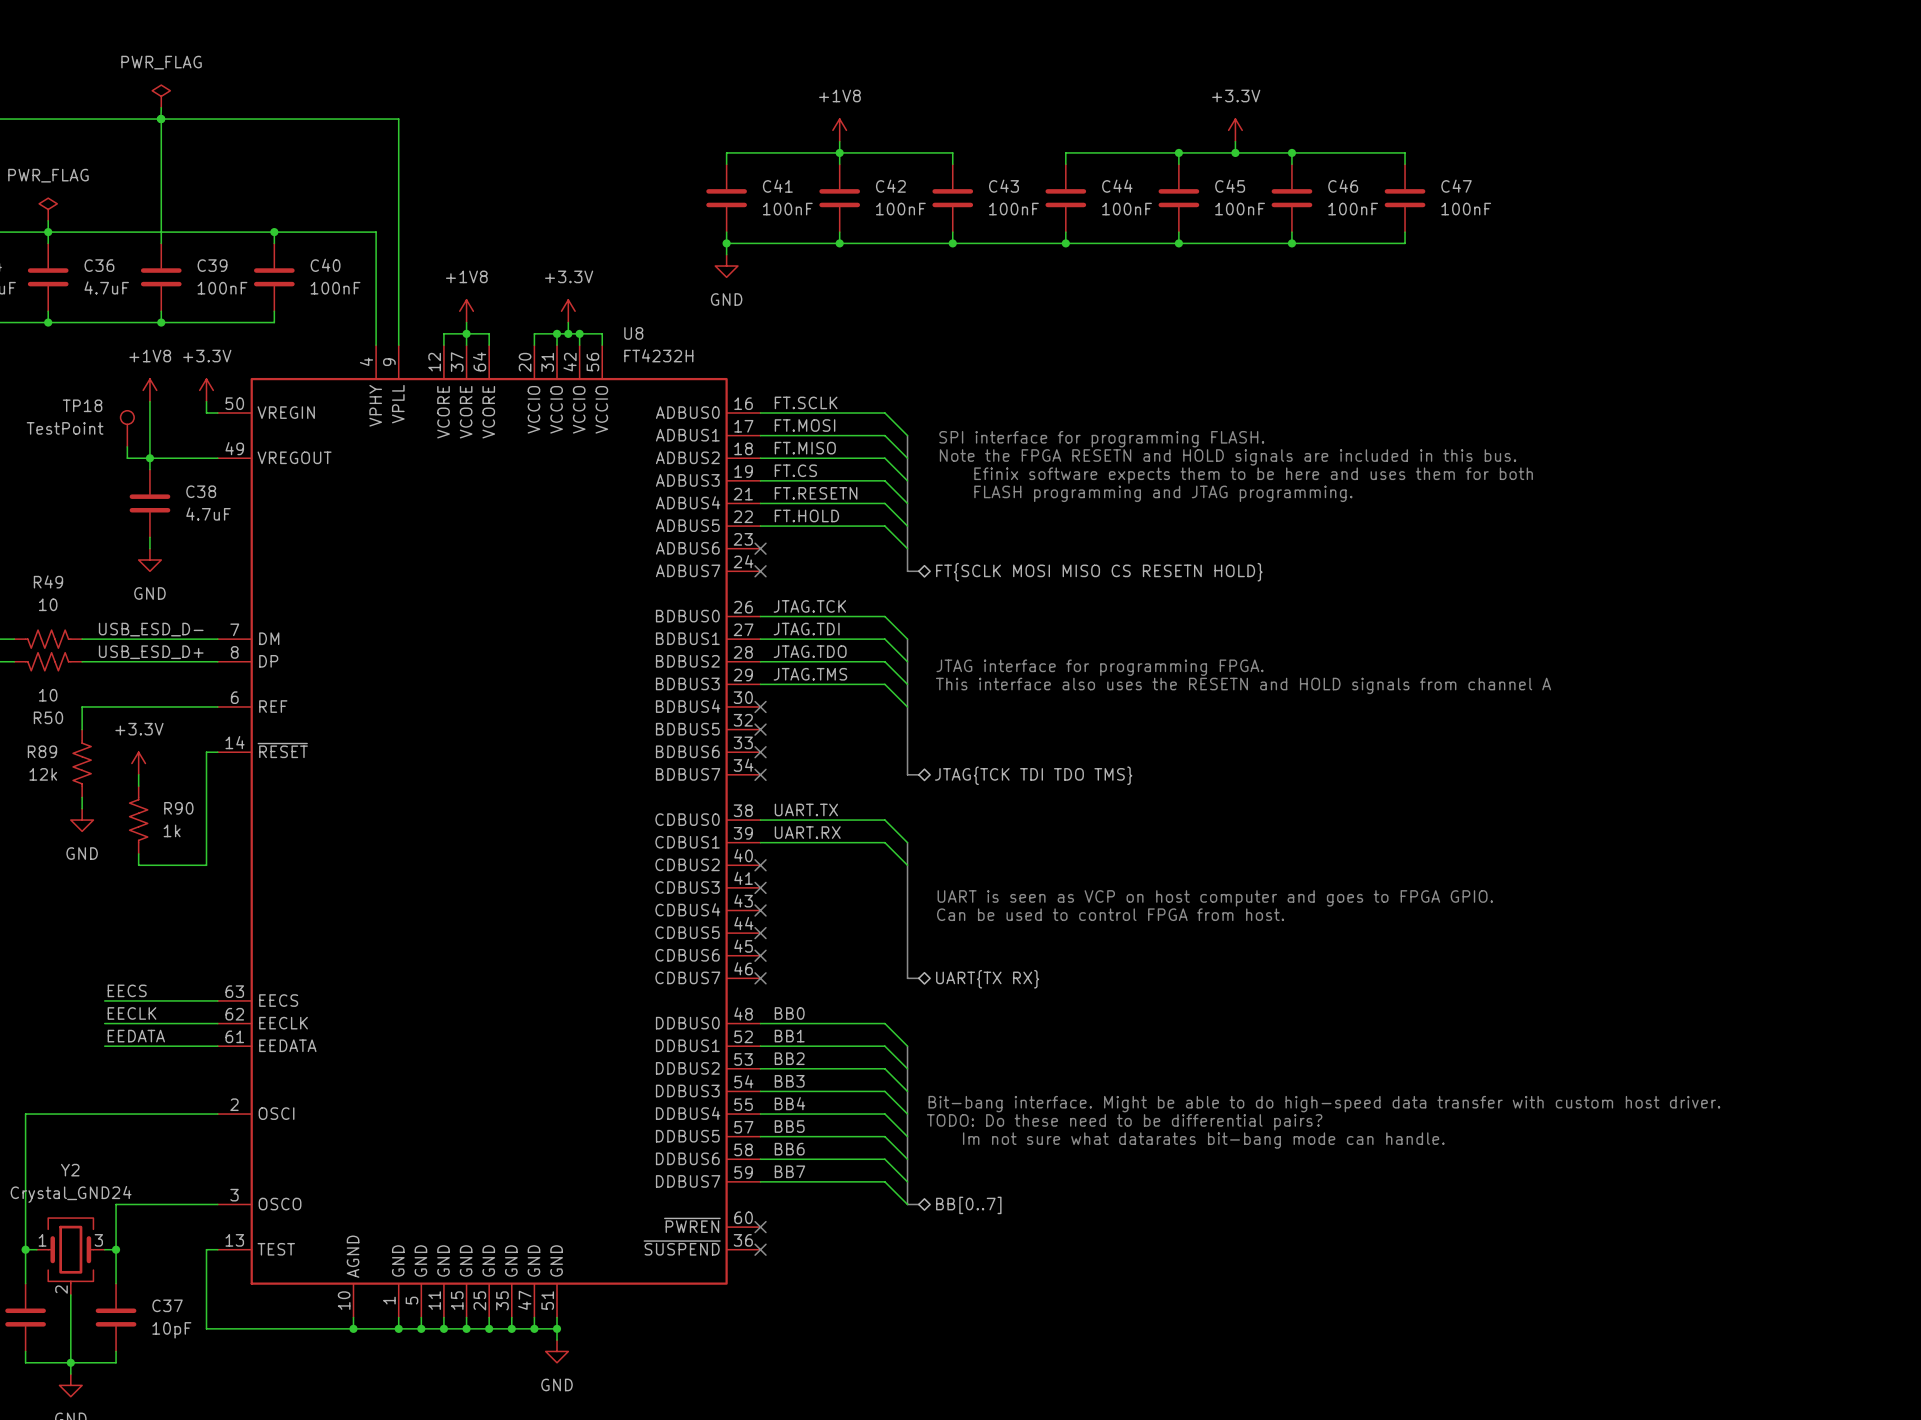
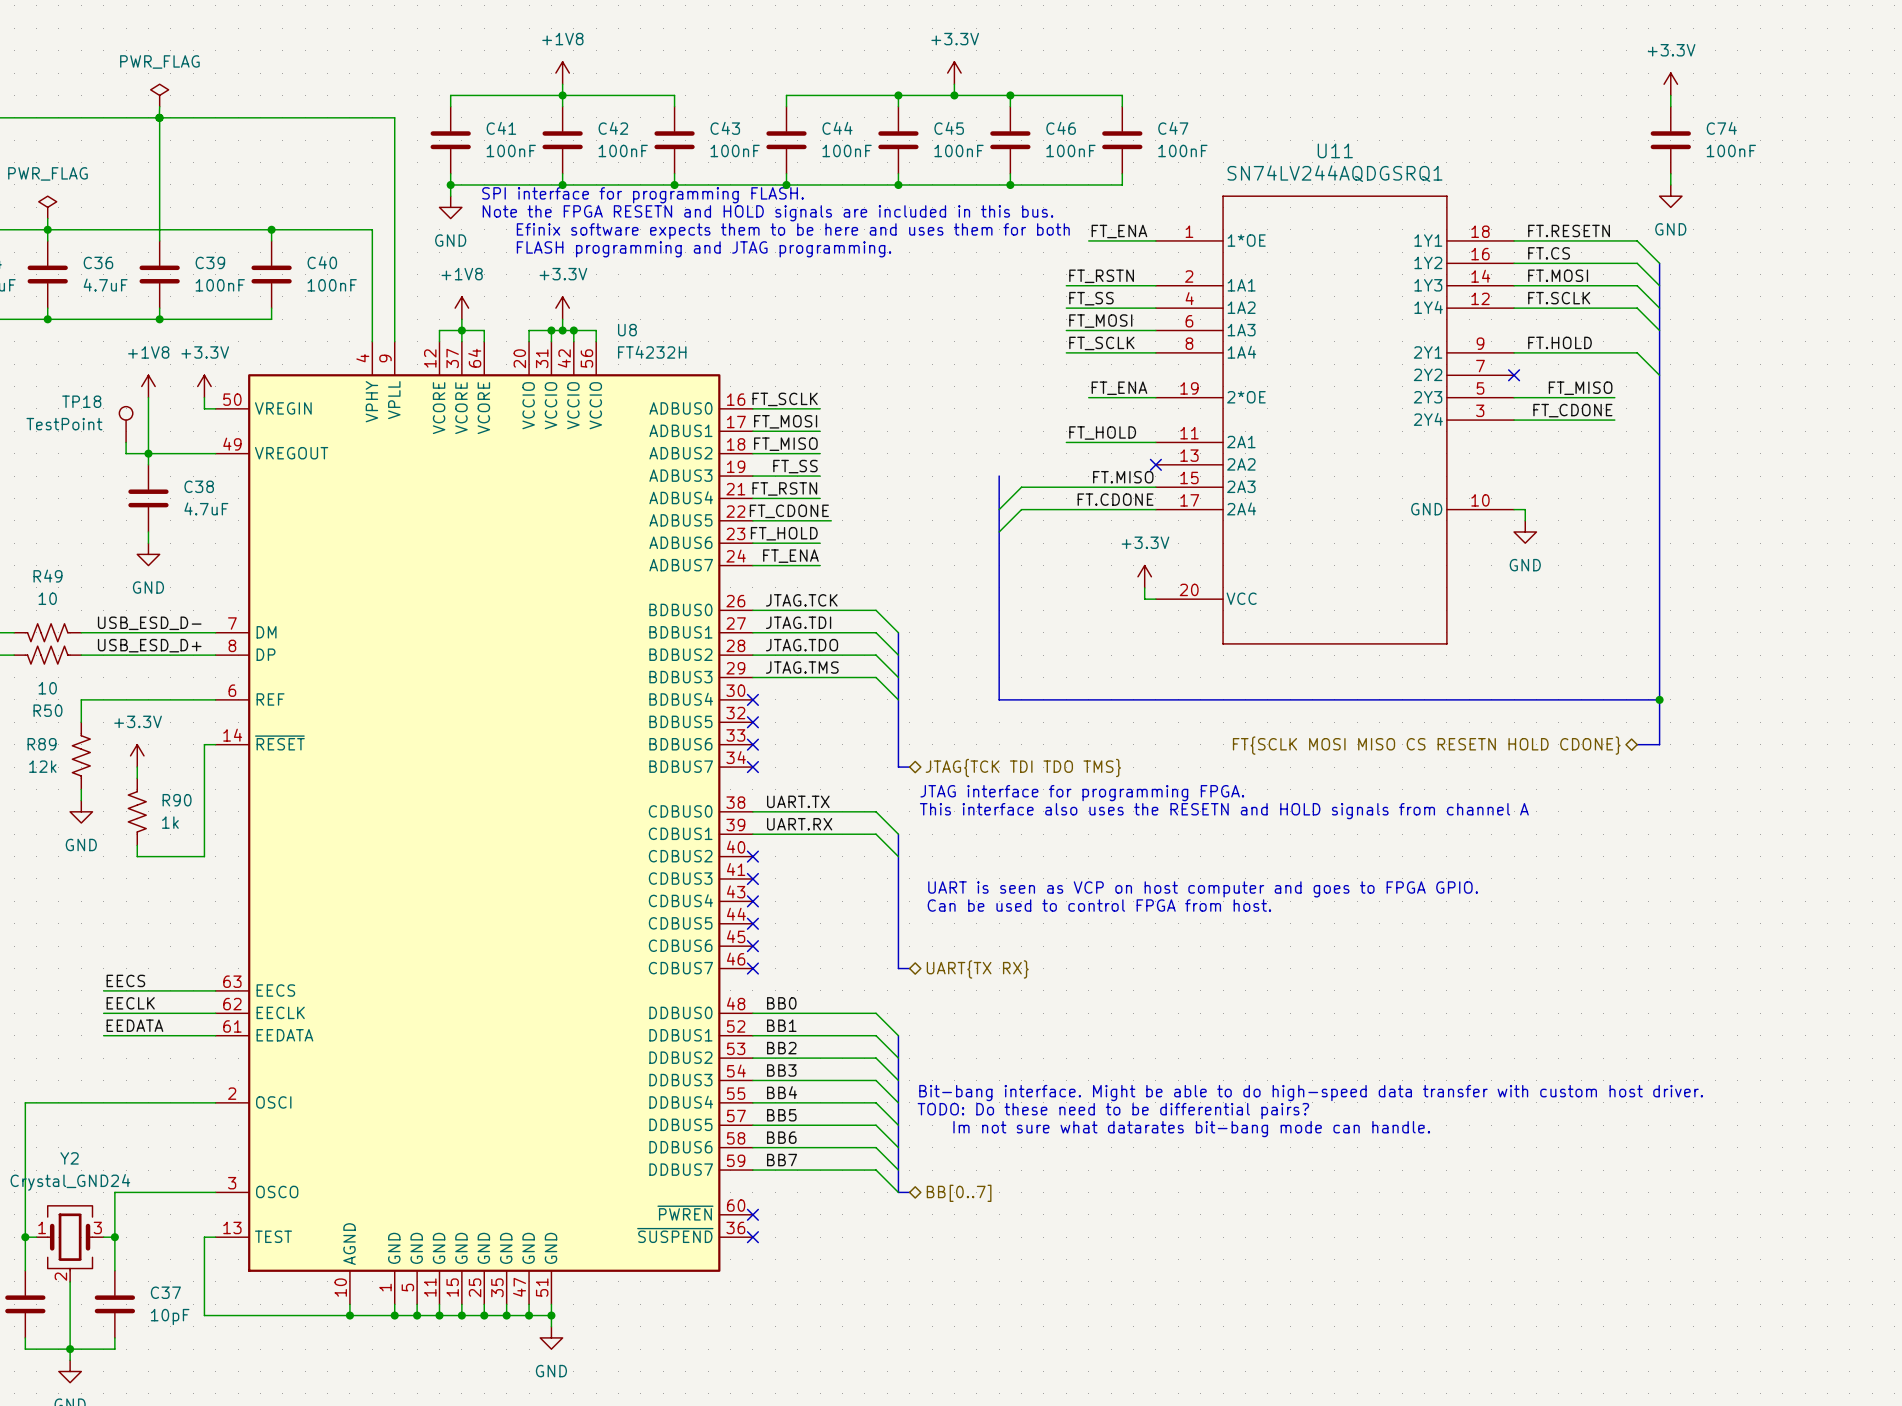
power symbol: none -> +1V8 (562, 73)
power symbol: none -> +3.3V (954, 73)
wire: none -> (954, 84) (954, 95)
power symbol: none -> +3.3V (1670, 84)
junction: none -> (562, 95)
wire: none -> (898, 95) (898, 106)
junction: none -> (898, 95)
junction: none -> (954, 95)
junction: none -> (1010, 95)
wire: none -> (1670, 95) (1670, 106)
wire: none -> (450, 106) (450, 95) (674, 95) (674, 106)
wire: none -> (786, 106) (786, 95) (1122, 95) (1122, 106)
power symbol: +1V8 (839, 130) -> none
power symbol: +3.3V (1235, 130) -> none
wire: (839, 141) (839, 164) -> none
wire: (1235, 141) (1235, 152) -> none
C74: none -> 100nF (1670, 140)
junction: (839, 152) -> none
wire: (1178, 152) (1178, 164) -> (1010, 95) (1010, 106)
junction: (1178, 152) -> none
junction: (1235, 152) -> none
wire: (1291, 152) (1291, 164) -> none
junction: (1291, 152) -> none
wire: (726, 164) (726, 152) (952, 152) (952, 164) -> none
wire: (1065, 164) (1065, 152) (1405, 152) (1405, 164) -> none
wire: none -> (450, 173) (450, 196)
wire: none -> (562, 173) (562, 184)
wire: none -> (1122, 173) (1122, 184) (450, 184)
wire: none -> (1670, 173) (1670, 184)
junction: none -> (450, 184)
junction: none -> (562, 184)
junction: none -> (674, 184)
junction: none -> (786, 184)
junction: none -> (898, 184)
junction: none -> (1010, 184)
text: none -> SPI interface for programming FLASH. (642, 195)
C41 position: (726, 198) -> (450, 140)
C42 position: (839, 198) -> (562, 140)
C43 position: (952, 198) -> (674, 140)
C44 position: (1065, 198) -> (786, 140)
C45 position: (1178, 198) -> (898, 140)
C46 position: (1291, 198) -> (1010, 140)
C47 position: (1405, 198) -> (1122, 140)
power symbol: none -> GND (1670, 196)
power symbol: none -> GND (450, 207)
text: none -> Note the FPGA RESETN and HOLD signals are included in this bus. (767, 213)
wire: (726, 232) (726, 254) -> (562, 84) (562, 106)
wire: (839, 232) (839, 243) -> (674, 173) (674, 184)
wire: (952, 232) (952, 243) -> (786, 173) (786, 184)
wire: (1065, 232) (1065, 243) -> (898, 173) (898, 184)
wire: (1178, 232) (1178, 243) -> (1010, 173) (1010, 184)
wire: (1291, 232) (1291, 243) -> none
wire: (1405, 232) (1405, 243) (1167, 243) -> none
text: none -> Efinix software expects them to be here and uses them for both (793, 231)
label: none -> FT_ENA (1119, 231)
label: none -> FT.RESETN (1569, 230)
wire: (726, 243) (1099, 243) -> none
junction: (726, 243) -> none
junction: (839, 243) -> none
junction: (952, 243) -> none
junction: (1065, 243) -> none
junction: (1178, 243) -> none
junction: (1291, 243) -> none
wire: none -> (1514, 240) (1637, 240) (1659, 263)
text: none -> FLASH programming and JTAG programming. (704, 249)
label: none -> FT.CS (1549, 253)
power symbol: GND (726, 266) -> none
wire: none -> (1514, 263) (1637, 263) (1659, 285)
bus: none -> (1659, 263) (1659, 744) (1637, 744)
label: none -> FT.MOSI (1558, 275)
label: none -> FT_RSTN (1101, 276)
wire: none -> (1066, 285) (1155, 285)
wire: none -> (1514, 285) (1637, 285) (1659, 308)
label: none -> FT_SS (1091, 298)
label: none -> FT.SCLK (1559, 298)
wire: none -> (1066, 308) (1155, 308)
wire: none -> (1514, 308) (1637, 308) (1659, 330)
label: none -> FT_MOSI (1100, 321)
wire: none -> (1066, 330) (1155, 330)
label: none -> FT_SCLK (1101, 343)
label: none -> FT.HOLD (1560, 342)
wire: none -> (1066, 352) (1155, 352)
wire: none -> (1514, 352) (1637, 352) (1659, 375)
no-connect mark: none -> (1514, 375)
label: none -> FT_ENA (1119, 388)
label: none -> FT_MISO (1580, 388)
wire: none -> (1088, 397) (1155, 397)
wire: none -> (1514, 397) (1614, 397)
label: FT.SCLK (806, 402) -> FT_SCLK (785, 399)
wire: (828, 413) (884, 413) (907, 435) -> none
label: none -> FT_CDONE (1572, 410)
U11: none -> SN74LV244AQDGSRQ1 (1334, 420)
wire: none -> (1514, 420) (1614, 420)
label: FT.MOSI (805, 425) -> FT_MOSI (785, 421)
wire: (828, 435) (884, 435) (907, 458) -> none
bus: (907, 435) (907, 571) (918, 571) -> none
label: none -> FT_HOLD (1102, 432)
text: SPI interface for programming FLASH. (1101, 439) -> none
wire: none -> (1066, 442) (1155, 442)
label: FT.MISO (805, 448) -> FT_MISO (785, 444)
text: Note the FPGA RESETN and HOLD signals are included in this bus. (1228, 457) -> none
wire: (828, 458) (884, 458) (907, 480) -> none
no-connect mark: none -> (1155, 464)
label: FT.CS (795, 470) -> none
label: none -> FT_SS (795, 466)
text: Efinix software expects them to be here and uses them for both (1253, 475) -> none
wire: (828, 480) (884, 480) (907, 503) -> none
bus: none -> (999, 476) (999, 699) (1659, 699)
label: none -> FT.MISO (1123, 477)
wire: none -> (1155, 487) (1021, 487) (999, 509)
label: FT.RESETN (816, 493) -> FT_RSTN (784, 488)
text: FLASH programming and JTAG programming. (1163, 493) -> none
wire: (828, 503) (884, 503) (907, 526) -> none
label: none -> FT.CDONE (1115, 499)
wire: none -> (1155, 509) (1021, 509) (999, 531)
wire: none -> (1514, 509) (1525, 509) (1525, 520)
label: FT.HOLD (806, 515) -> FT_HOLD (784, 533)
label: none -> FT_CDONE (789, 511)
wire: (839, 526) (884, 526) (907, 548) -> none
power symbol: none -> GND (1525, 531)
wire: none -> (752, 543) (820, 543)
no-connect mark: (760, 548) -> none
label: none -> FT_ENA (790, 556)
wire: none -> (752, 565) (820, 565)
no-connect mark: (760, 571) -> none
hierarchical label: FT{SCLK MOSI MISO CS RESETN HOLD} (1099, 572) -> none
power symbol: none -> +3.3V (1144, 576)
wire: none -> (1144, 587) (1144, 599) (1155, 599)
text position: JTAG interface for programming FPGA. (1100, 667) -> JTAG interface for programming FPGA. (1082, 793)
text position: This interface also uses the RESETN and HOLD signals from channel A (1243, 685) -> This interface also uses the RESETN and HOLD signals from channel A (1224, 811)
junction: none -> (1659, 699)
hierarchical label: none -> FT{SCLK MOSI MISO CS RESETN HOLD CDONE} (1426, 745)

